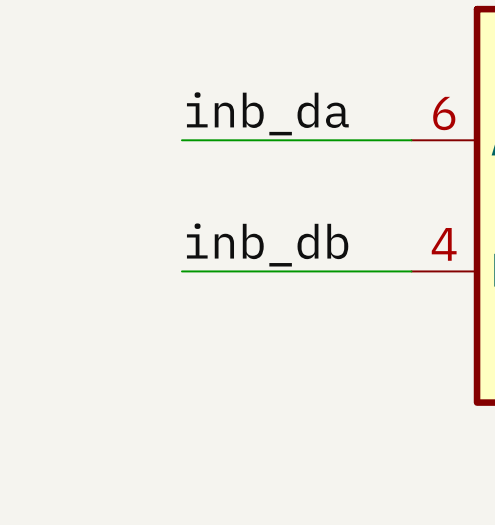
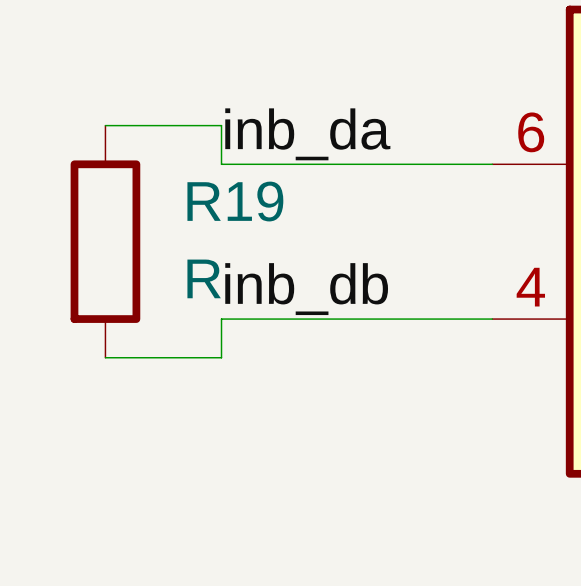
wire: none -> (105, 125) (221, 125) (221, 164)
R19: none -> R (105, 241)
wire: none -> (221, 319) (221, 357) (105, 357)

